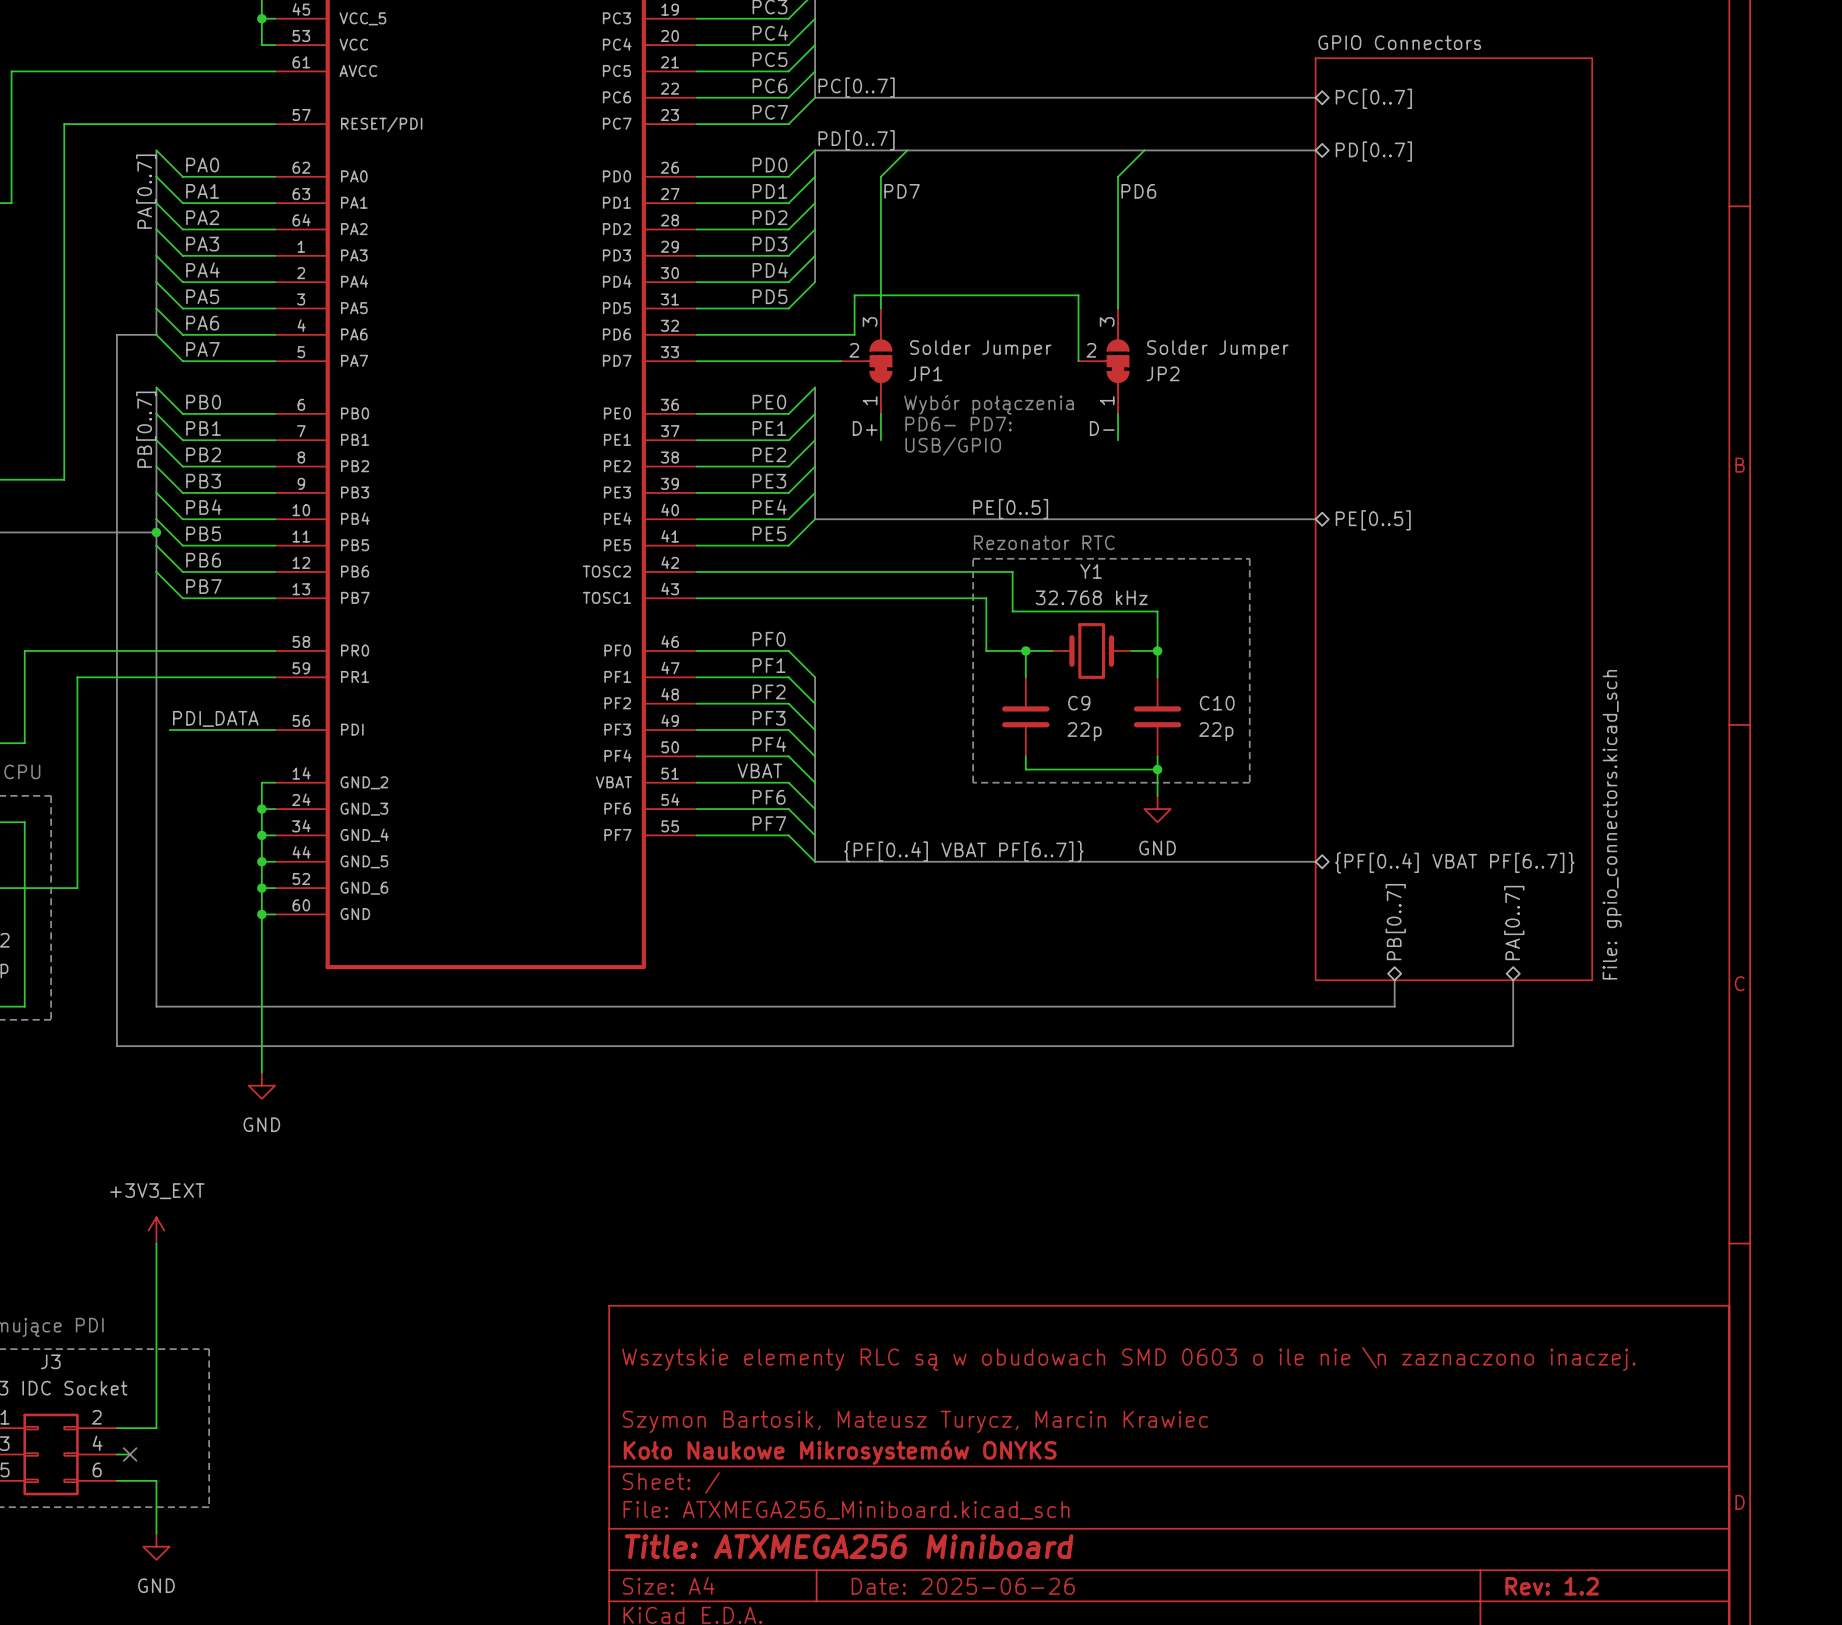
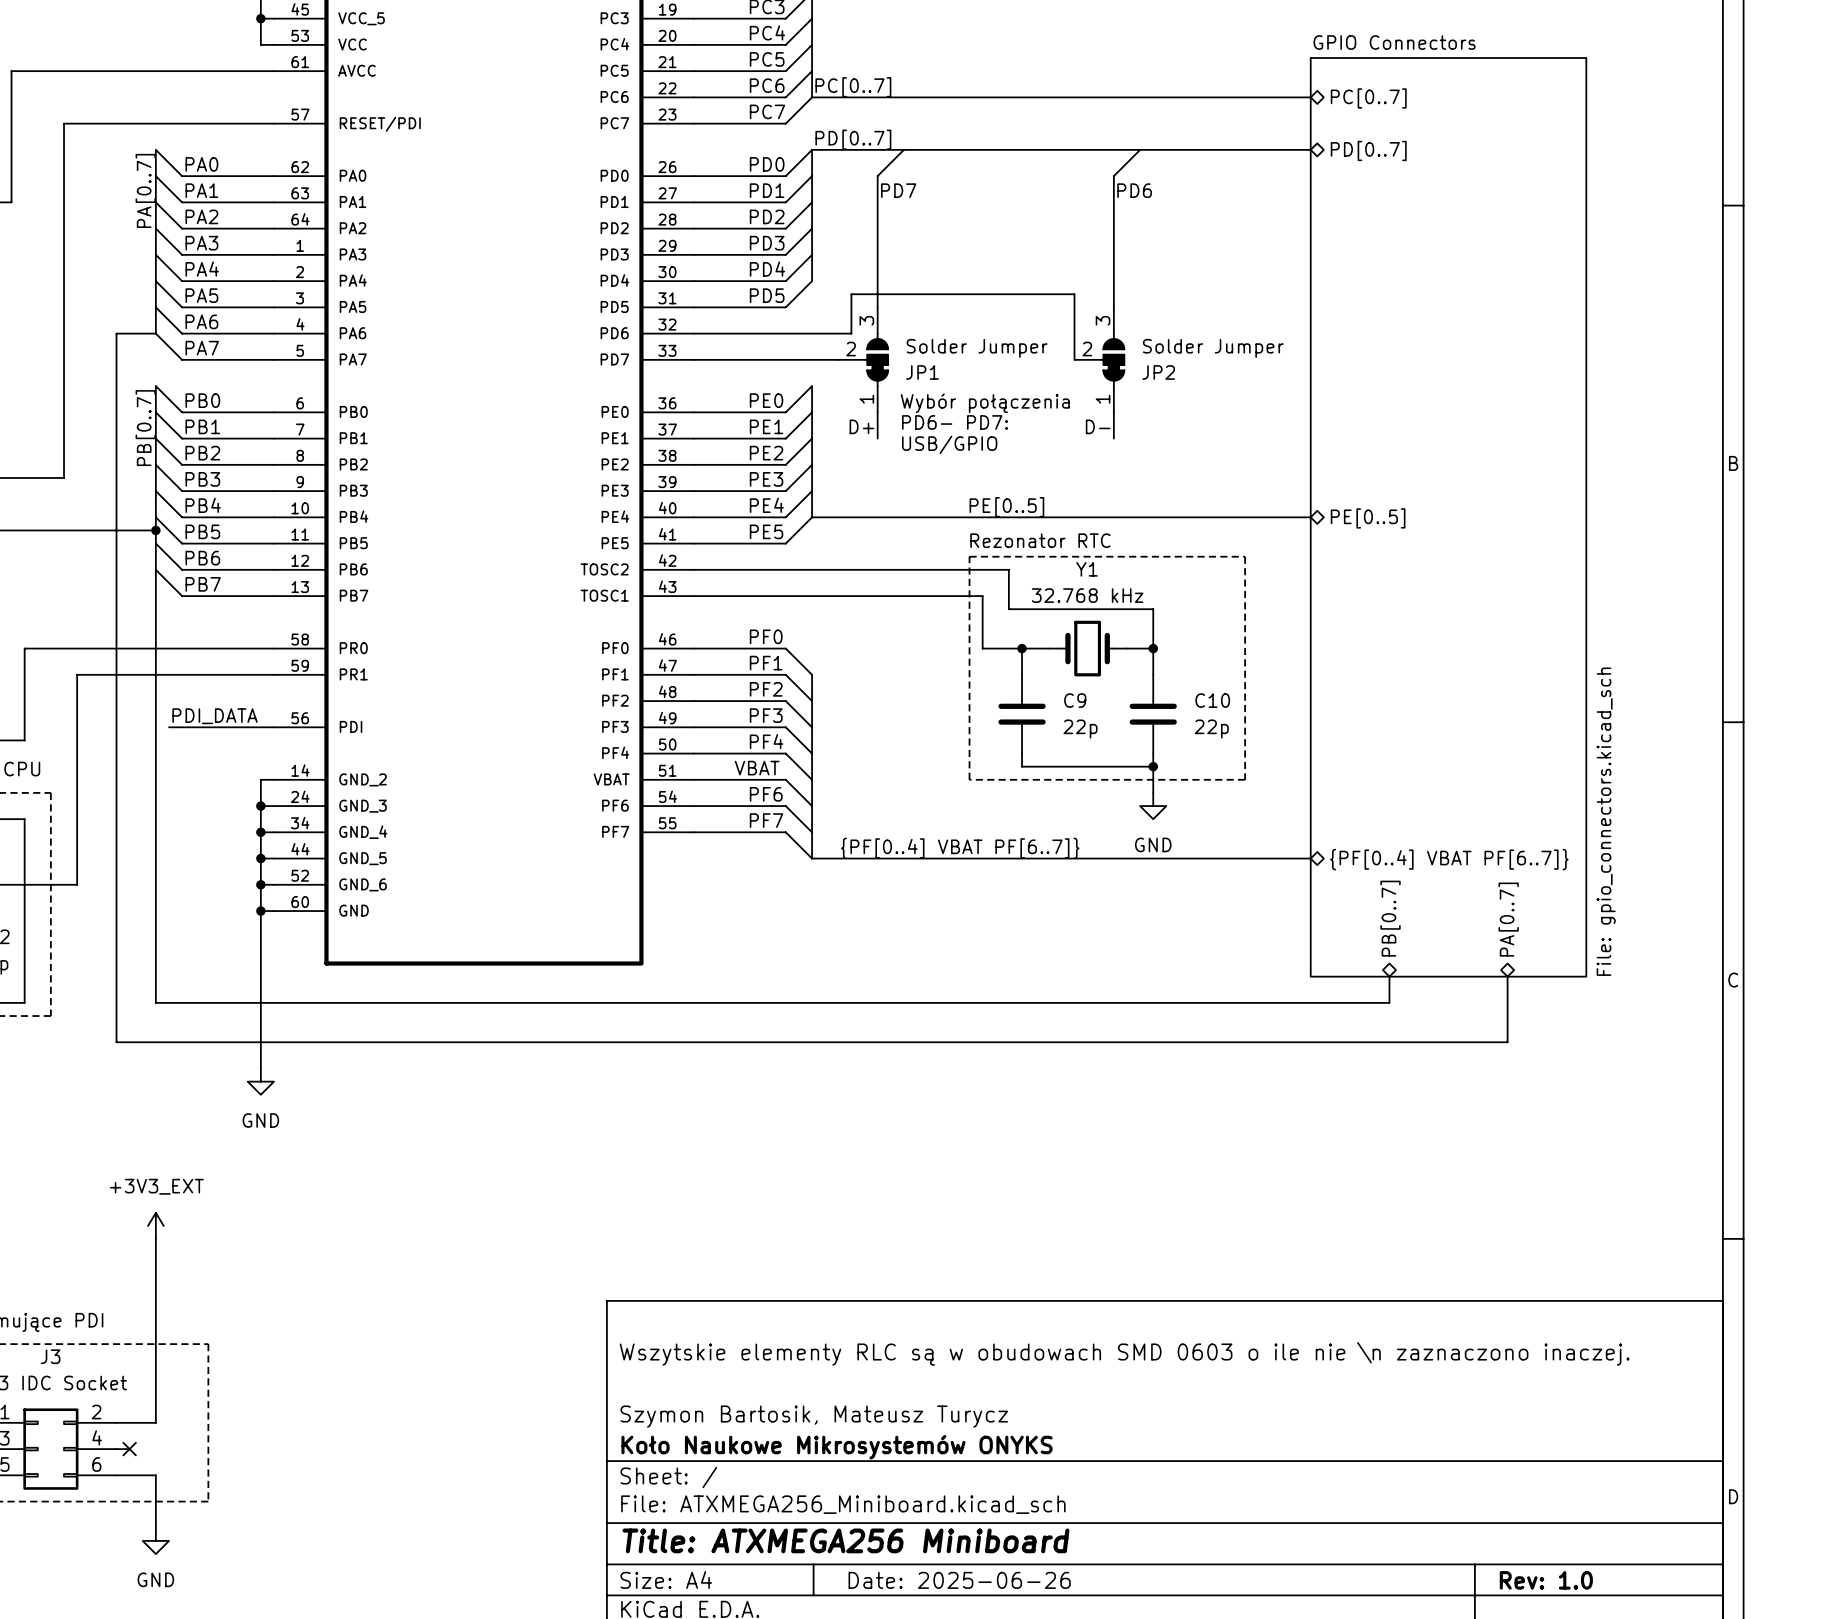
title block: Szymon Bartosik, Mateusz Turycz, Marcin Krawiec (915, 1421) -> Szymon Bartosik, Mateusz Turycz (814, 1416)
title block: Rev: 1.2 (1552, 1586) -> Rev: 1.0 (1546, 1580)

